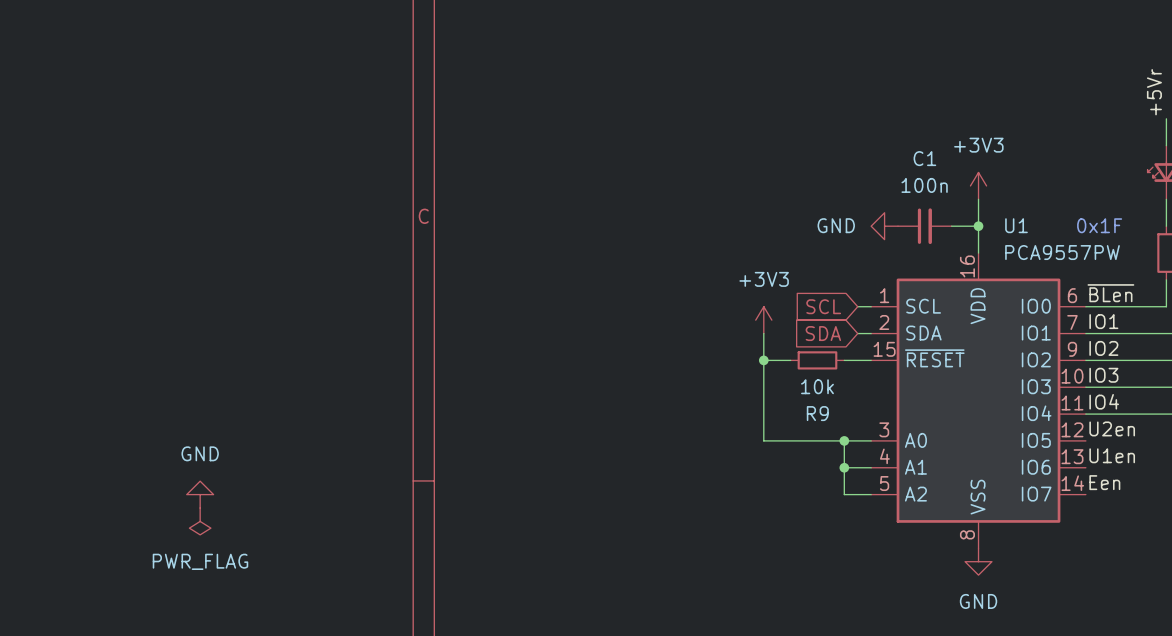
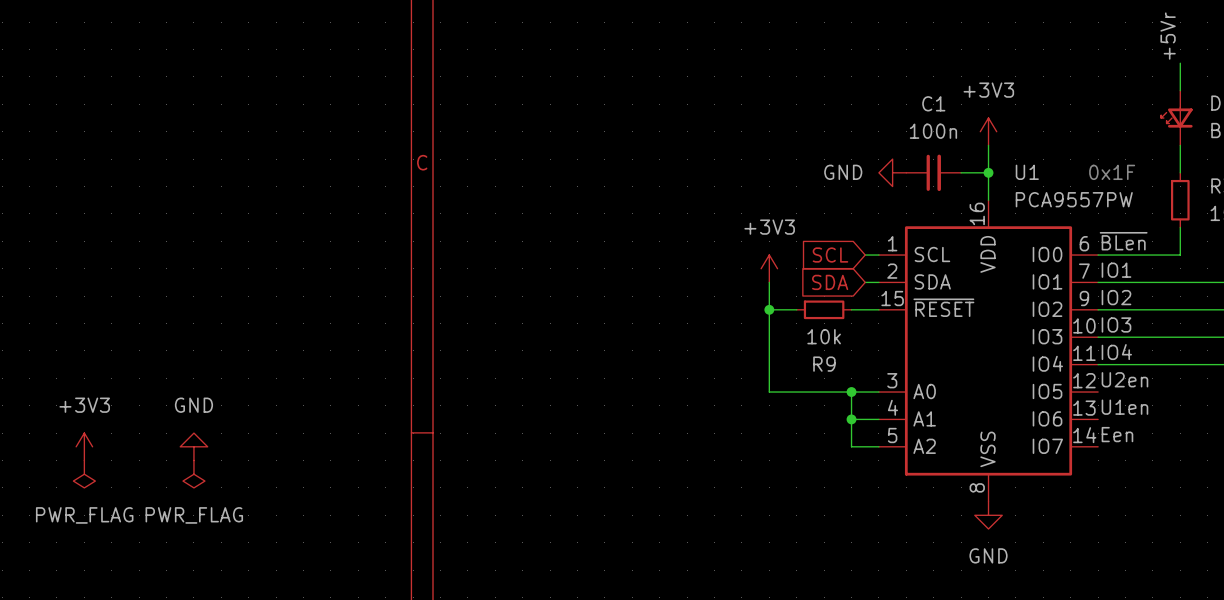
power symbol: none -> +3V3 (84, 446)
power symbol: none -> PWR_FLAG (84, 474)

